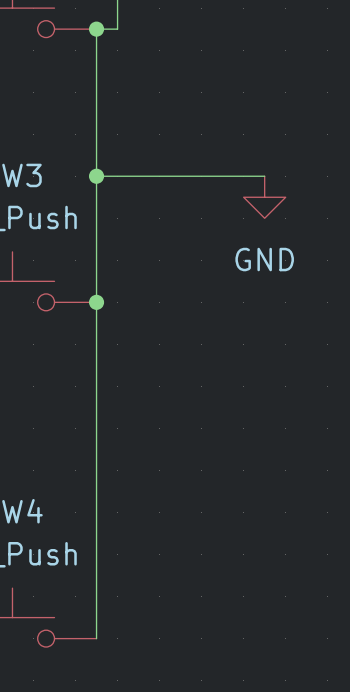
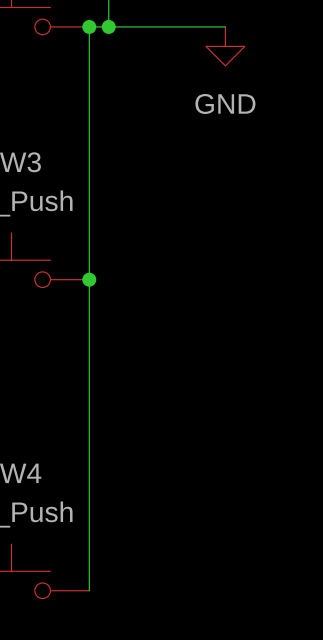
wire: none -> (108, 26) (225, 26)
junction: none -> (108, 26)
wire: (96, 176) (264, 176) -> none
junction: (96, 176) -> none
power symbol position: GND (264, 197) -> GND (225, 46)

